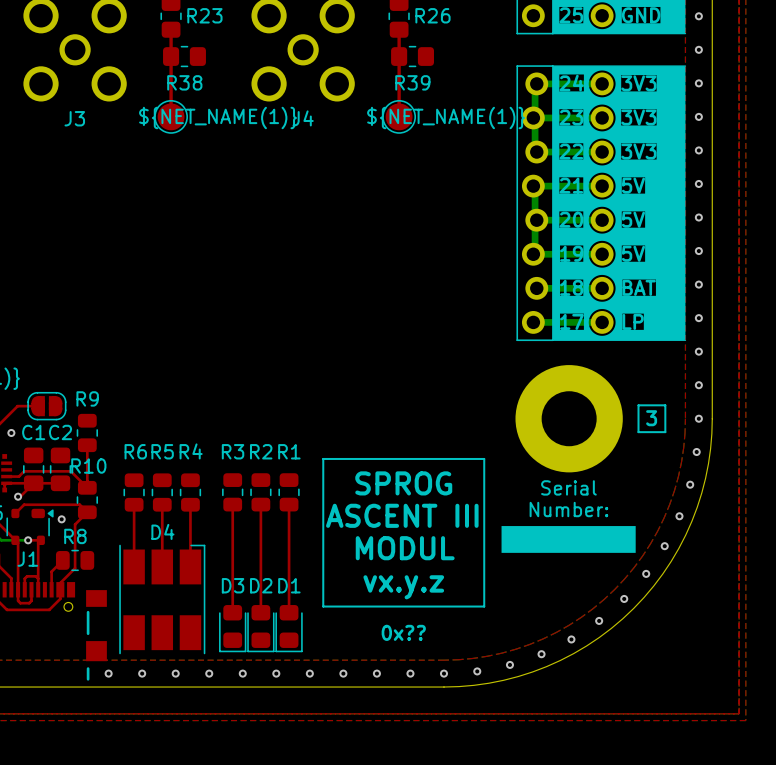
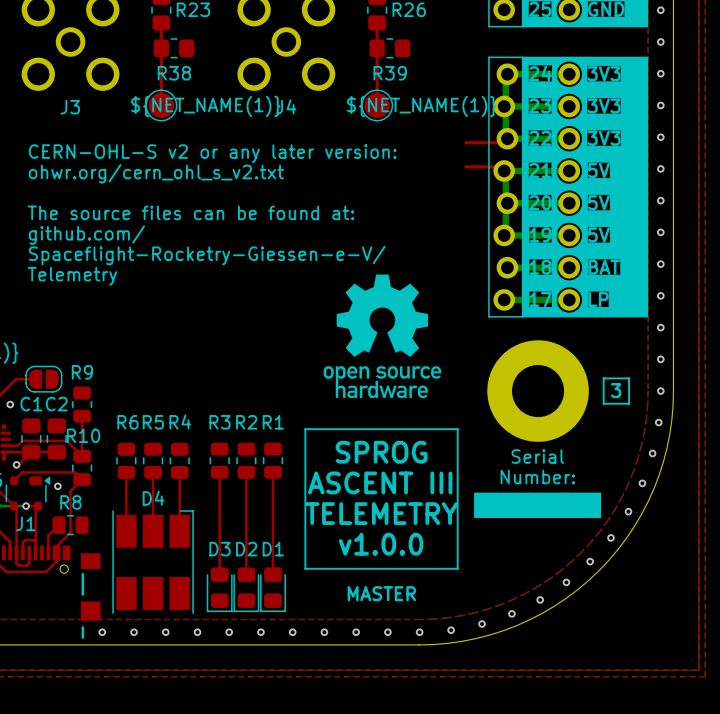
top track: none -> (507, 138) (503, 142) (465, 142)
text: none -> CERN-OHL-S v2 or any later version: (212, 153)
top track: none -> (465, 166) (500, 166) (504, 170)
text: none -> ohwr.org/cern_ohl_s_v2.txt (156, 173)
text: none -> The source files can be found at: (190, 212)
text: none -> github.com/ (86, 235)
text: none -> Spaceflight-Rocketry-Giessen-e-V/ (207, 255)
drawing: none -> [323, 274, 442, 399]
text: none -> Telemetry (72, 276)
text: MODUL (405, 548) -> TELEMETRY (381, 513)
text: vx.y.z (403, 587) -> v1.0.0 (381, 544)
text: 0x?? (403, 632) -> MASTER (381, 593)

